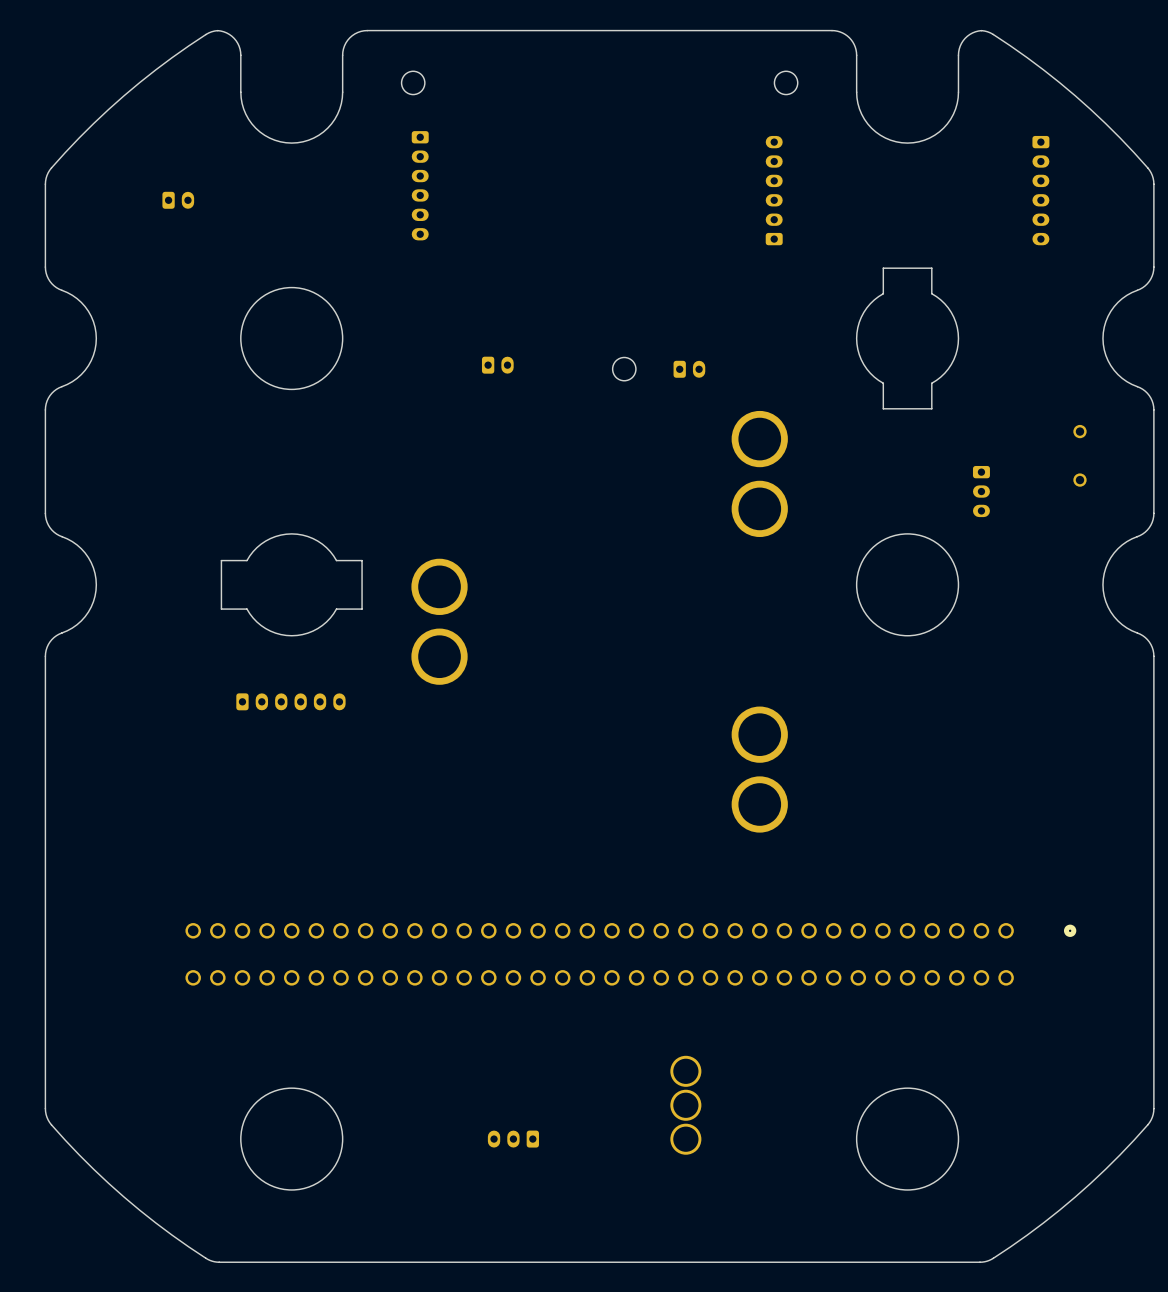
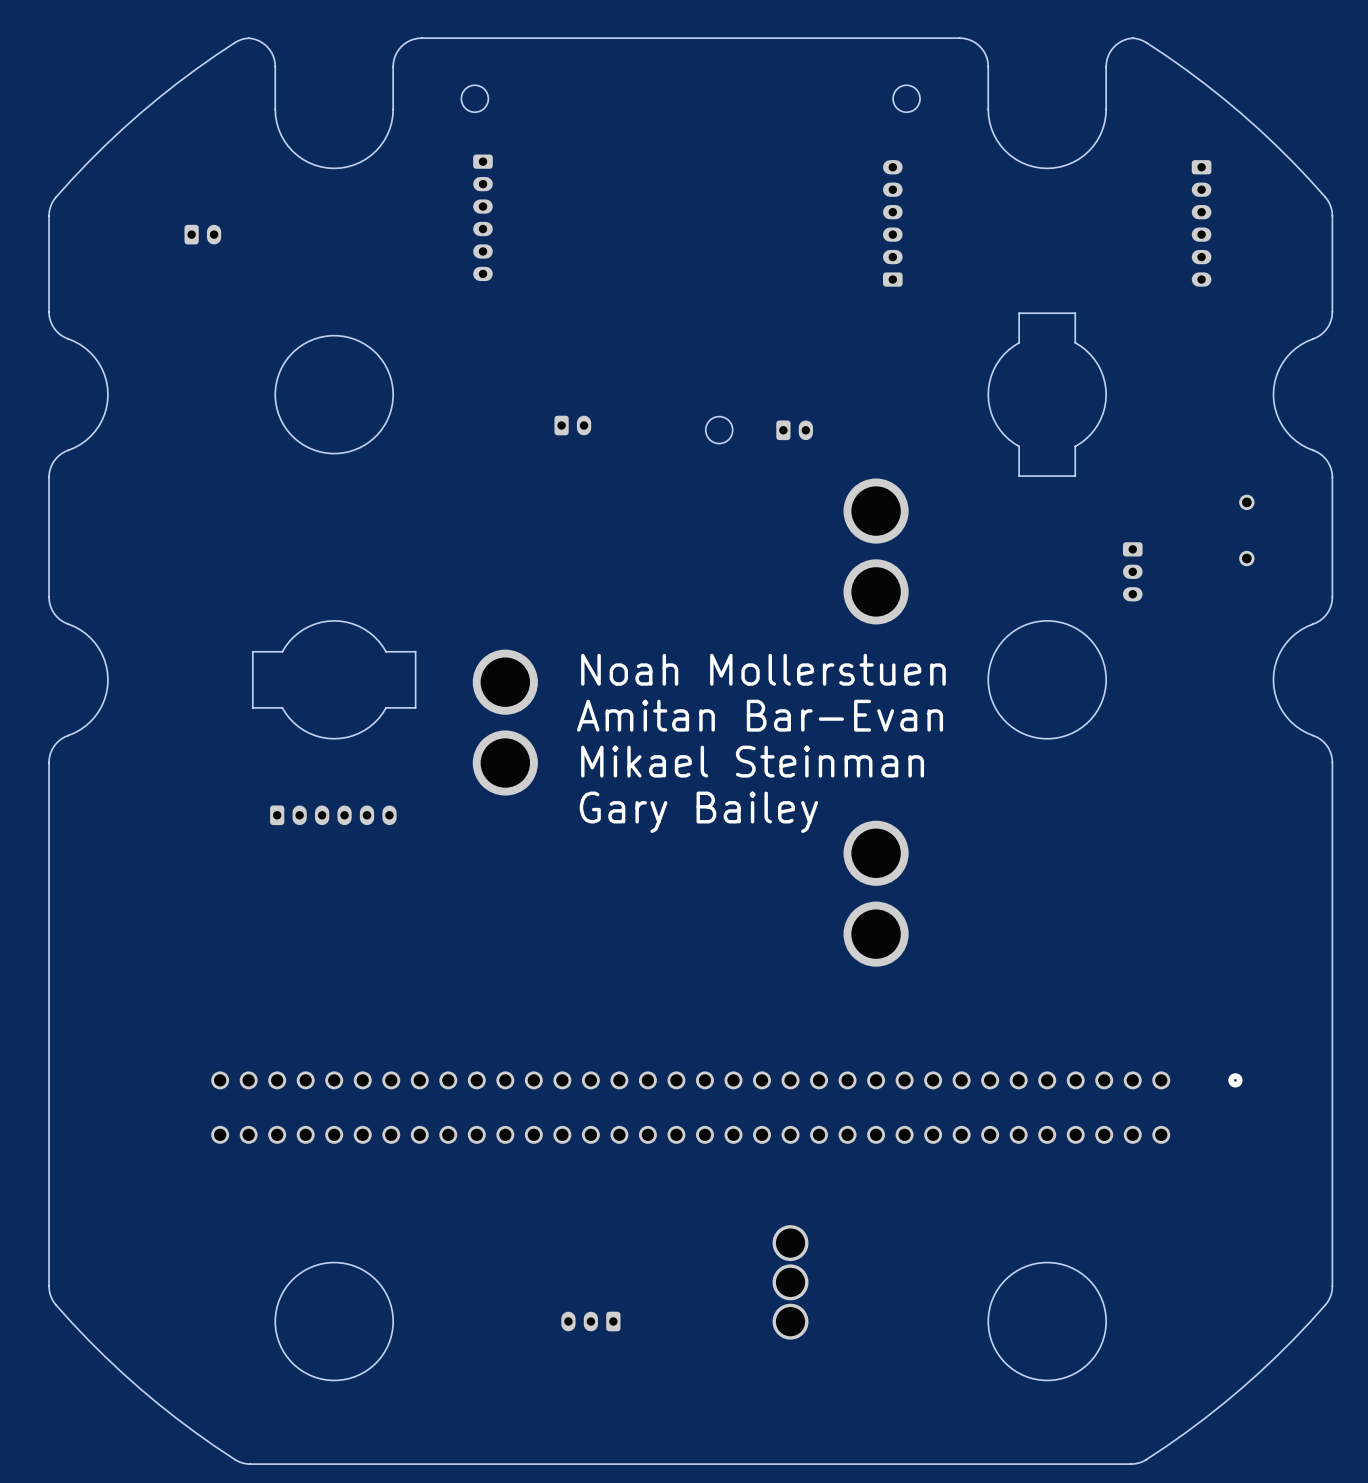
text: none -> Noah Mollerstuen (763, 669)
text: none -> Amitan Bar-Evan (760, 715)
text: none -> Mikael Steinman (752, 761)
text: none -> Gary Bailey (698, 812)

